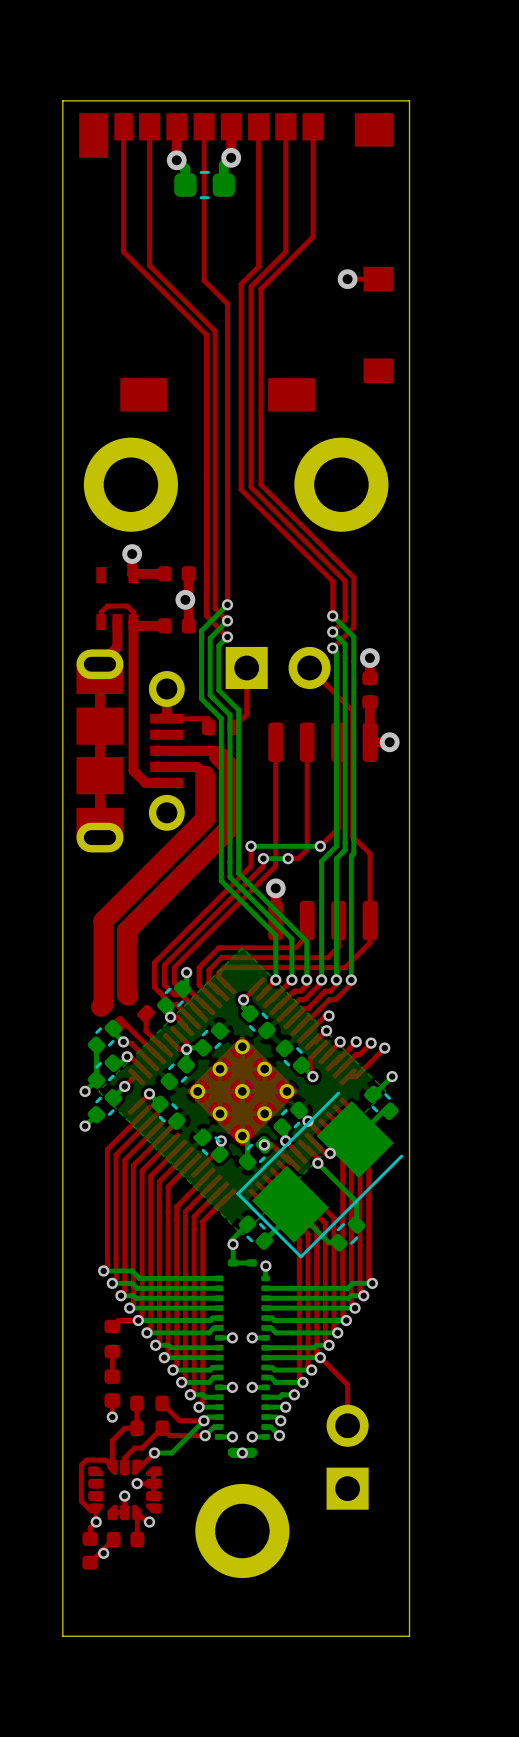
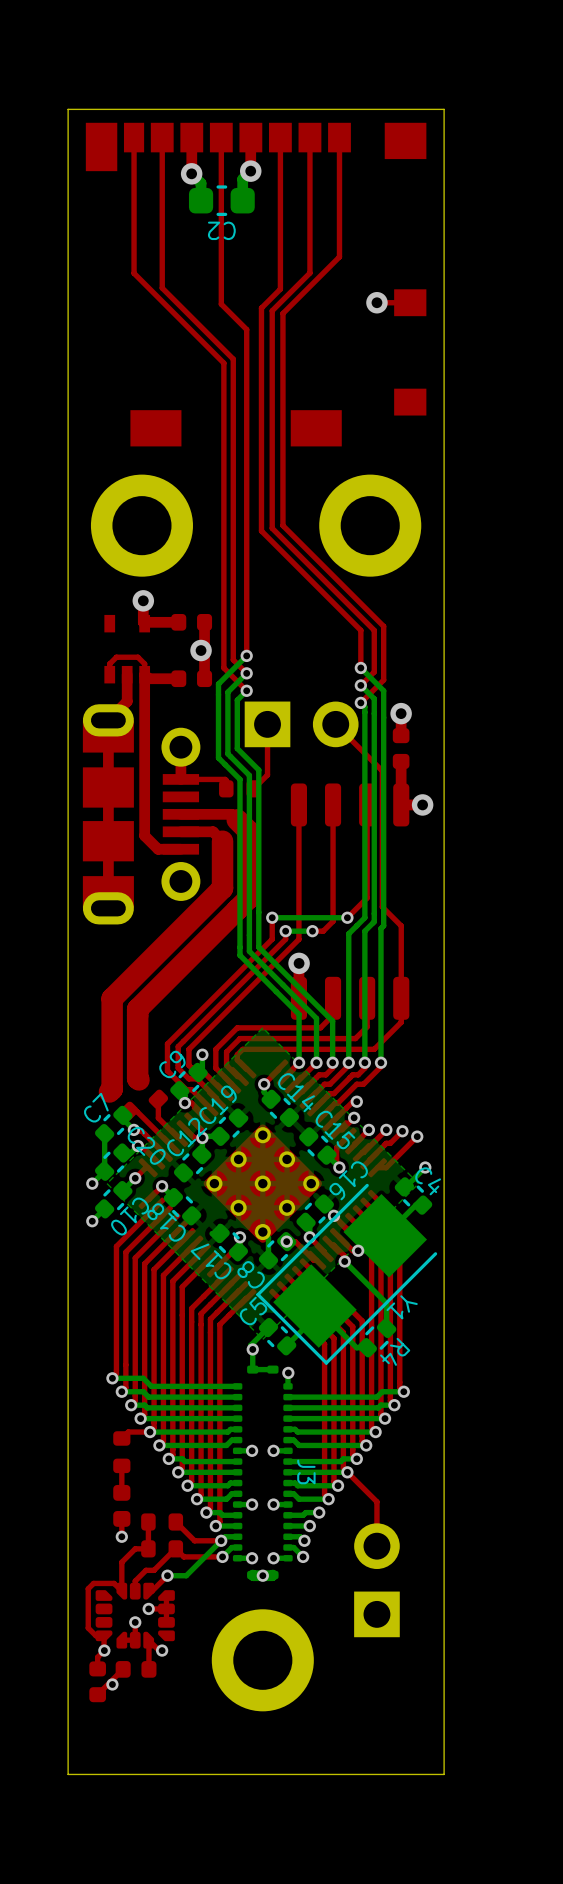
C2 name: none -> C2 (221, 230)
C9 name: none -> C9 (172, 1064)
C14 name: none -> C14 (296, 1092)
C19 name: none -> C19 (218, 1104)
C7 name: none -> C7 (96, 1107)
C15 name: none -> C15 (335, 1130)
C12 name: none -> C12 (187, 1136)
C20 name: none -> C20 (146, 1145)
C16 name: none -> C16 (348, 1180)
C4 name: none -> C4 (428, 1181)
C10 name: none -> C10 (130, 1216)
C18 name: none -> C18 (166, 1222)
C17 name: none -> C17 (211, 1261)
C8 name: none -> C8 (251, 1274)
Y1 name: none -> Y1 (402, 1307)
C5 name: none -> C5 (253, 1310)
R4 name: none -> R4 (395, 1351)
J3 name: none -> J3 (306, 1471)

